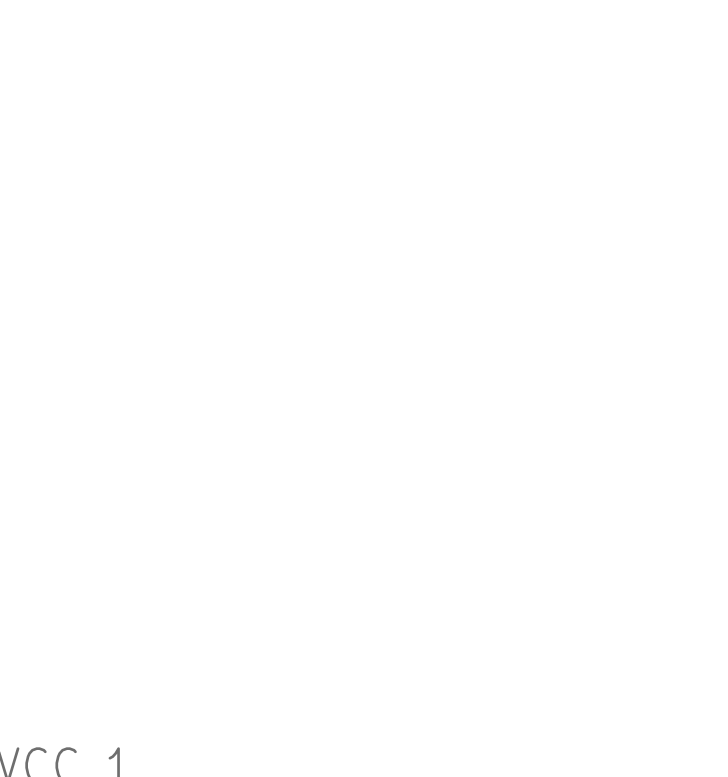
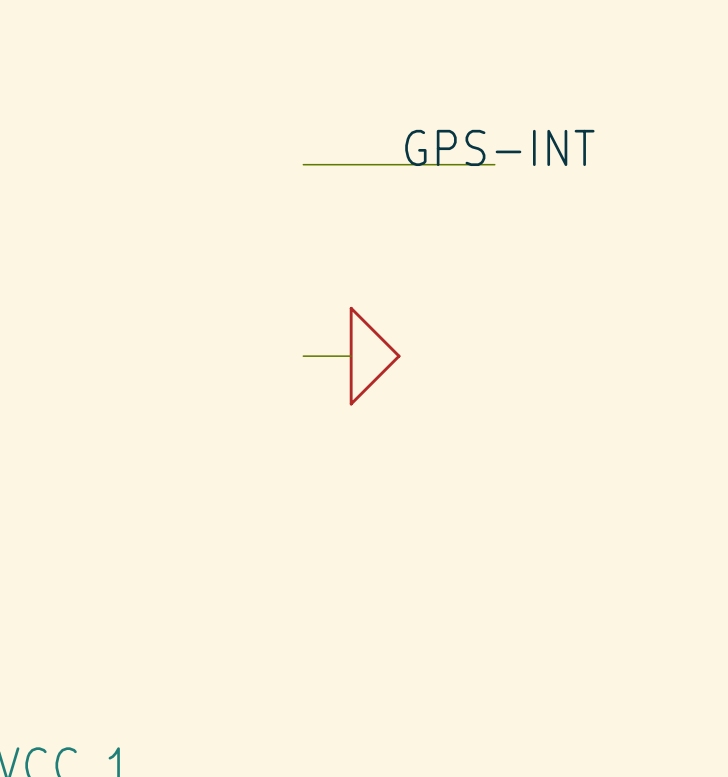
label: none -> GPS-INT (499, 147)
wire: none -> (303, 164) (494, 164)
wire: none -> (303, 356) (351, 356)
power symbol: none -> (375, 356)

